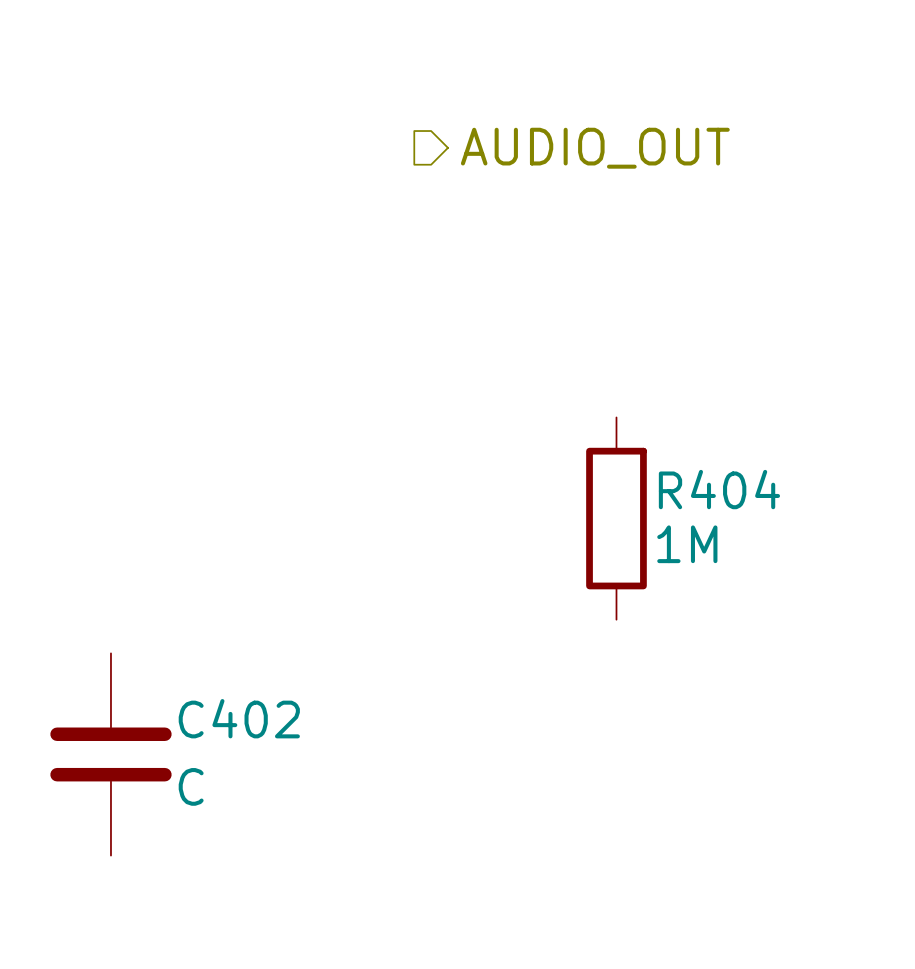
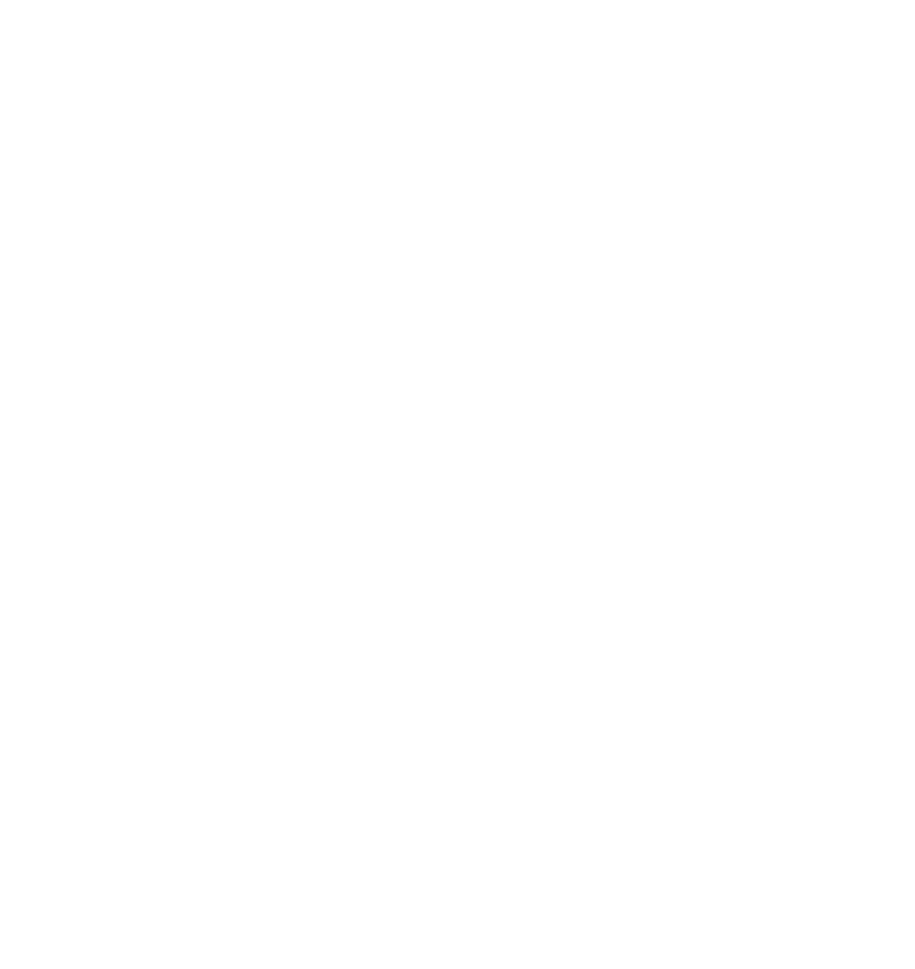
hierarchical label: AUDIO_OUT (595, 148) -> none
R404: 1M (616, 518) -> none
C402: C (110, 754) -> none

